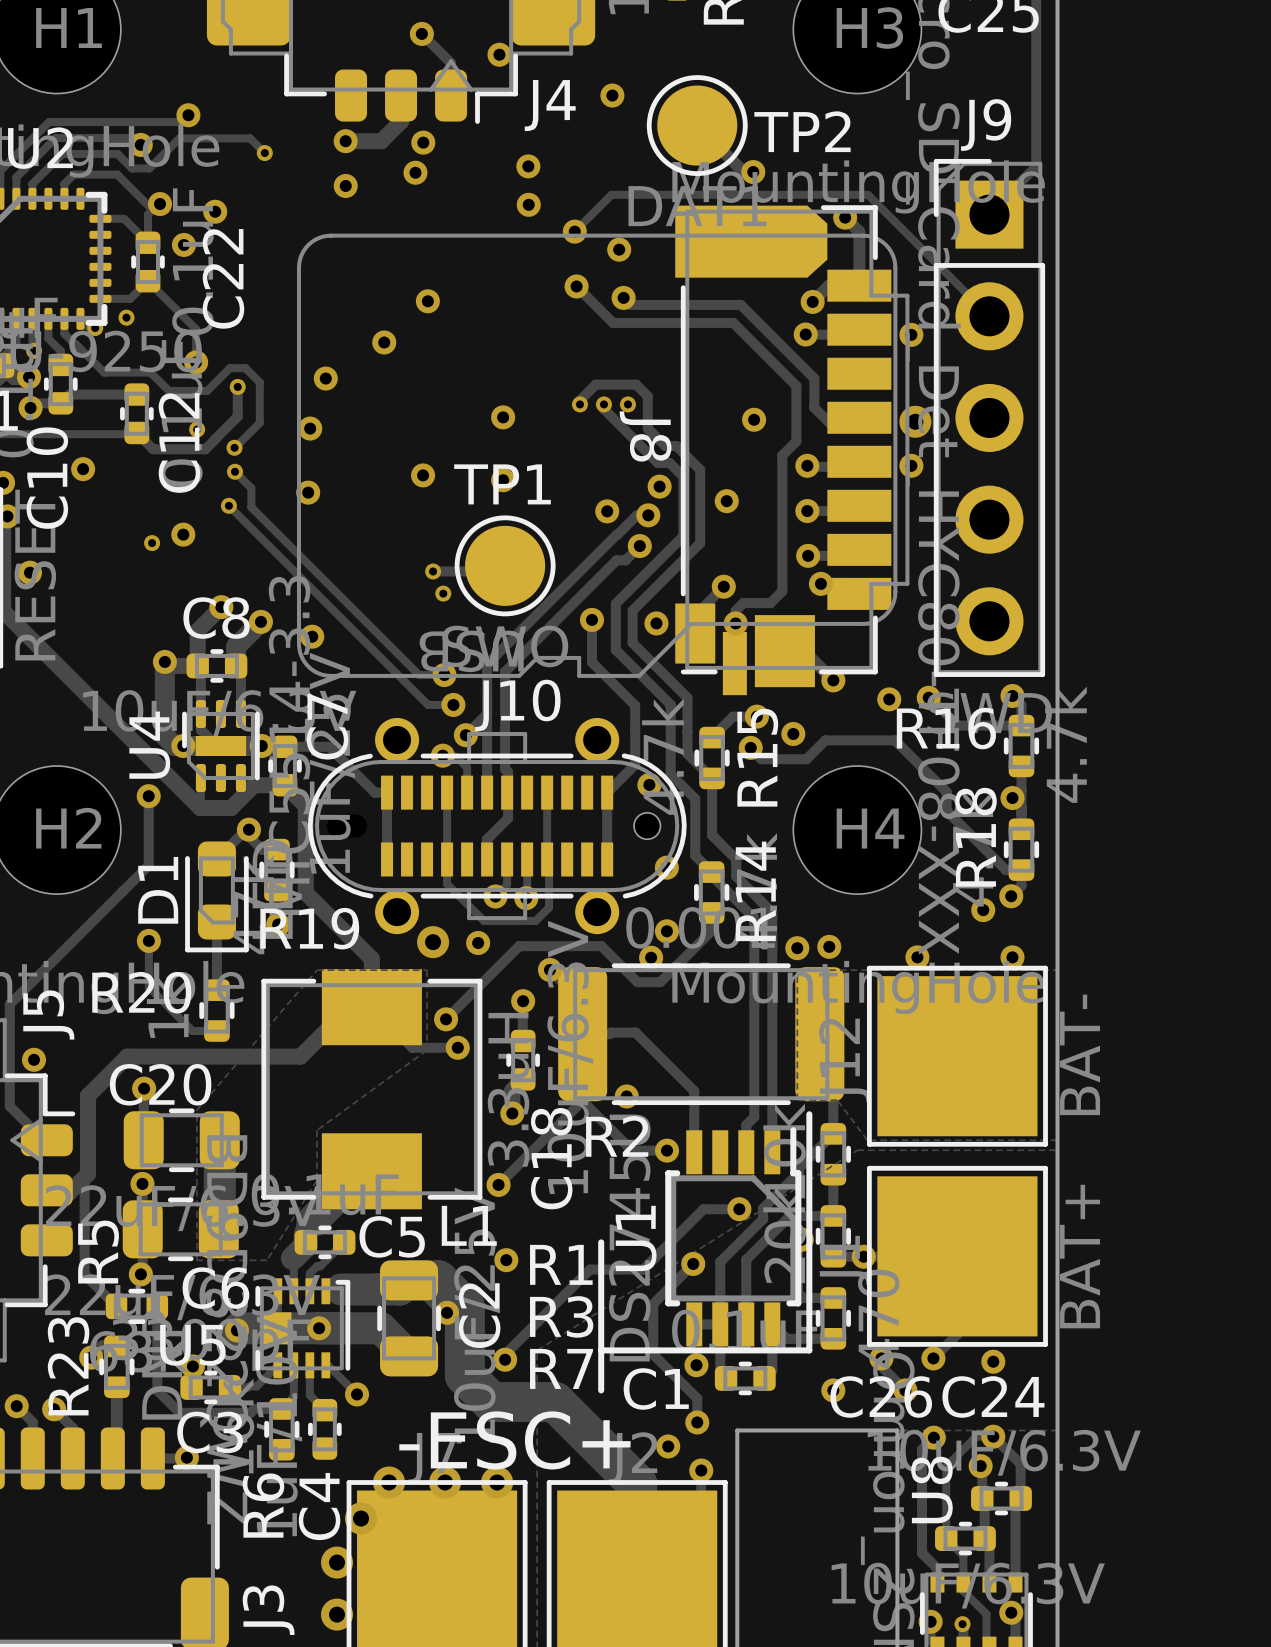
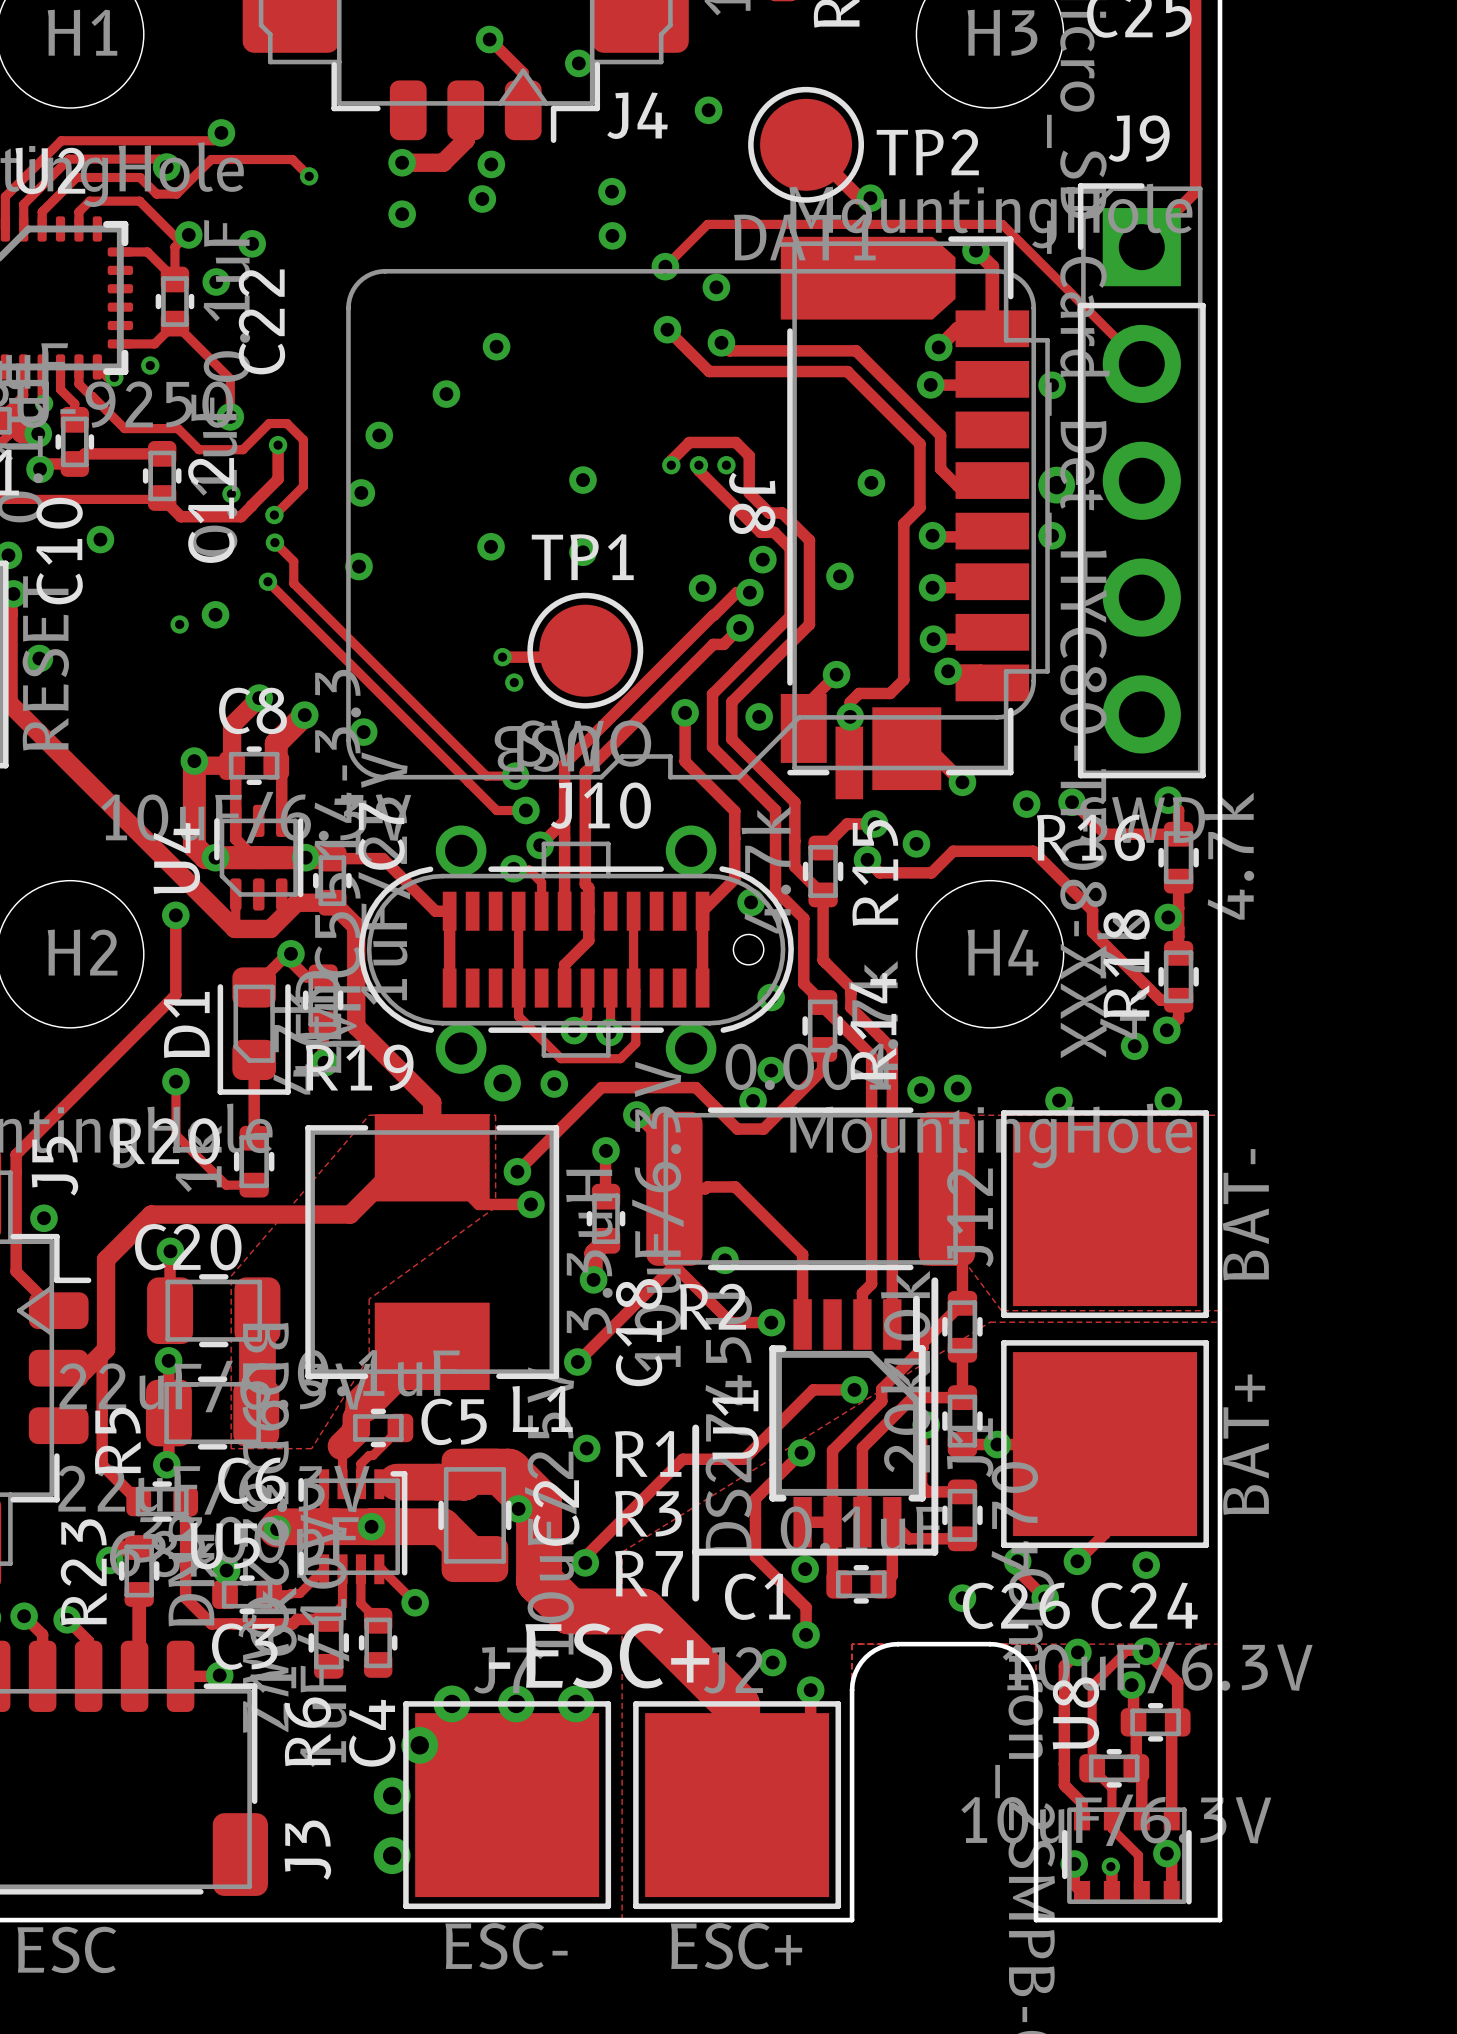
board edge: (777, 1430) (737, 1430) (737, 1470) -> (898, 1644) (880, 1647) (865, 1657) (855, 1672) (852, 1690)
board edge: (857, 1430) (897, 1430) (897, 1470) -> (990, 1644) (1007, 1647) (1022, 1657) (1032, 1672) (1036, 1690)

